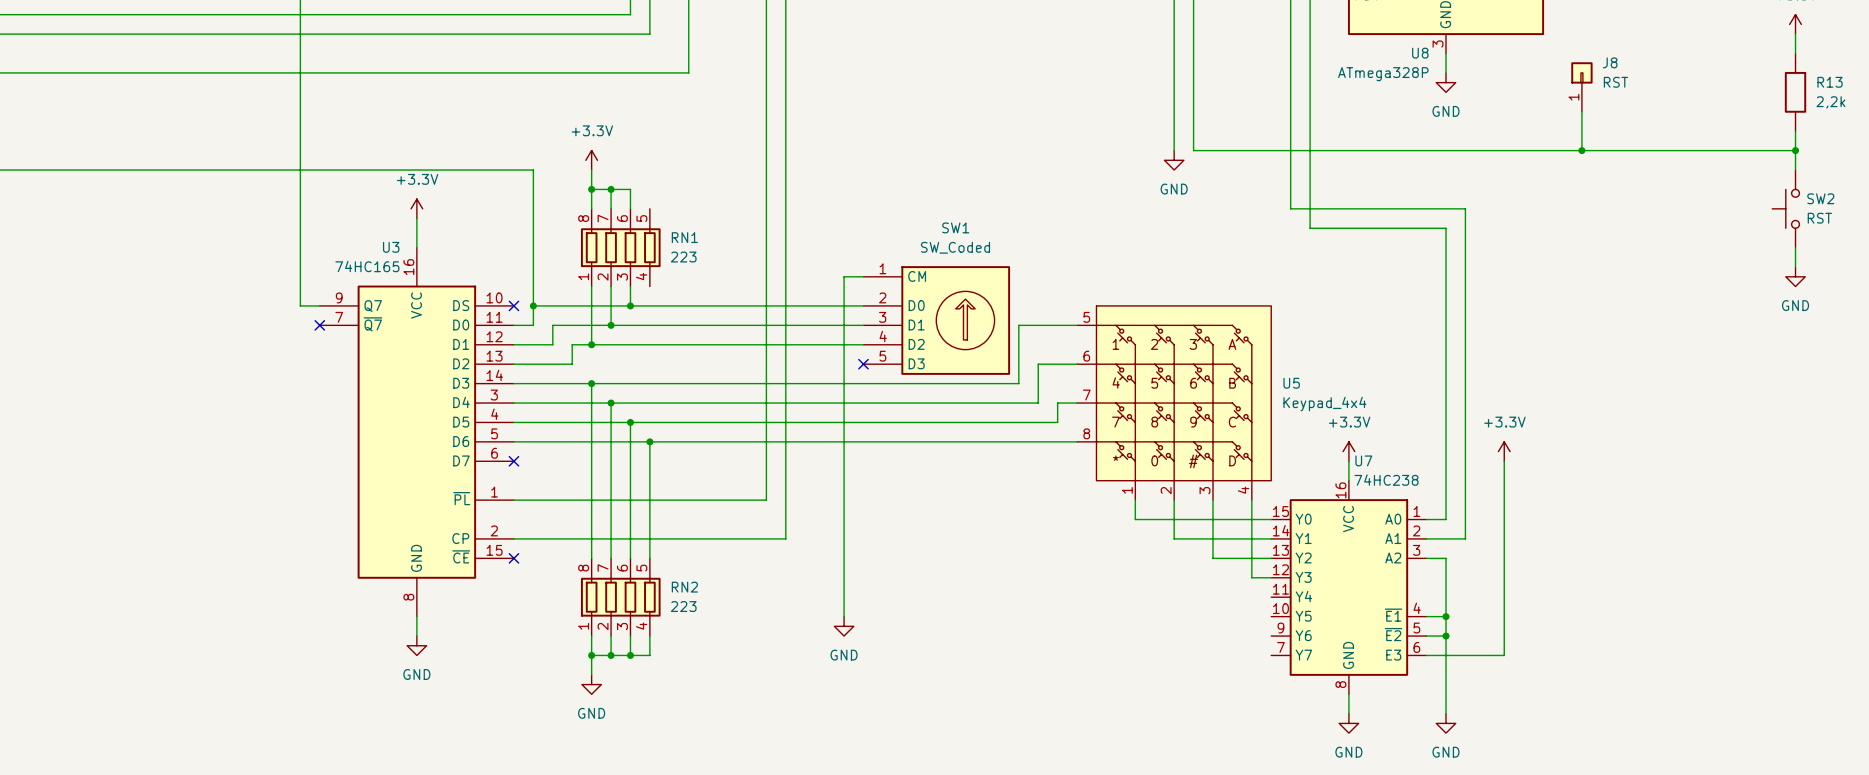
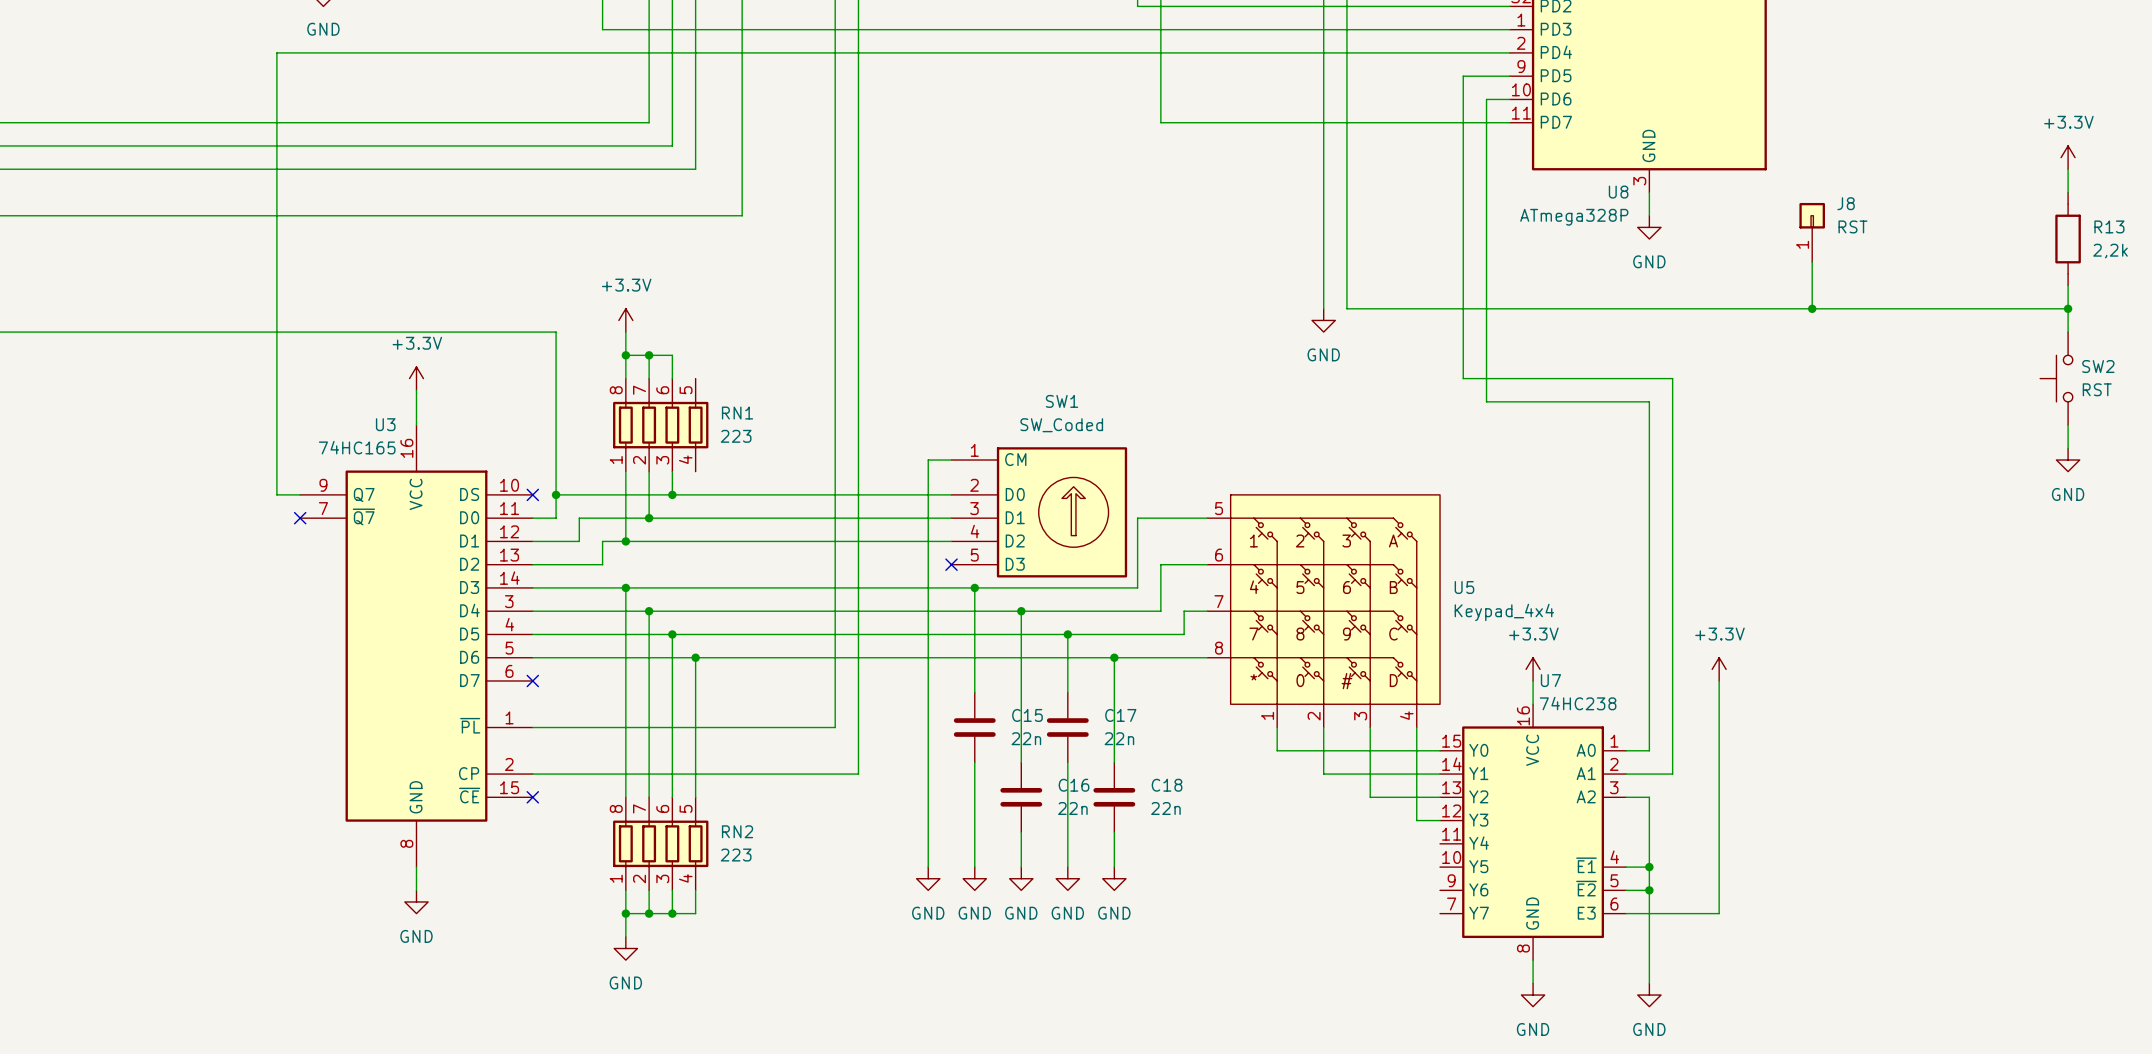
wire: none -> (974, 587) (974, 692)
junction: none -> (974, 587)
wire: none -> (1021, 611) (1021, 762)
junction: none -> (1021, 611)
wire: none -> (1067, 634) (1067, 692)
junction: none -> (1067, 634)
wire: none -> (1114, 657) (1114, 762)
junction: none -> (1114, 657)
C15: none -> 22n (974, 727)
C17: none -> 22n (1067, 727)
wire: none -> (974, 762) (974, 867)
wire: none -> (1067, 762) (1067, 867)
C16: none -> 22n (1021, 797)
C18: none -> 22n (1114, 797)
wire: none -> (1021, 832) (1021, 867)
wire: none -> (1114, 832) (1114, 867)
power symbol: none -> GND (974, 878)
power symbol: none -> GND (1021, 878)
power symbol: none -> GND (1067, 878)
power symbol: none -> GND (1114, 878)

